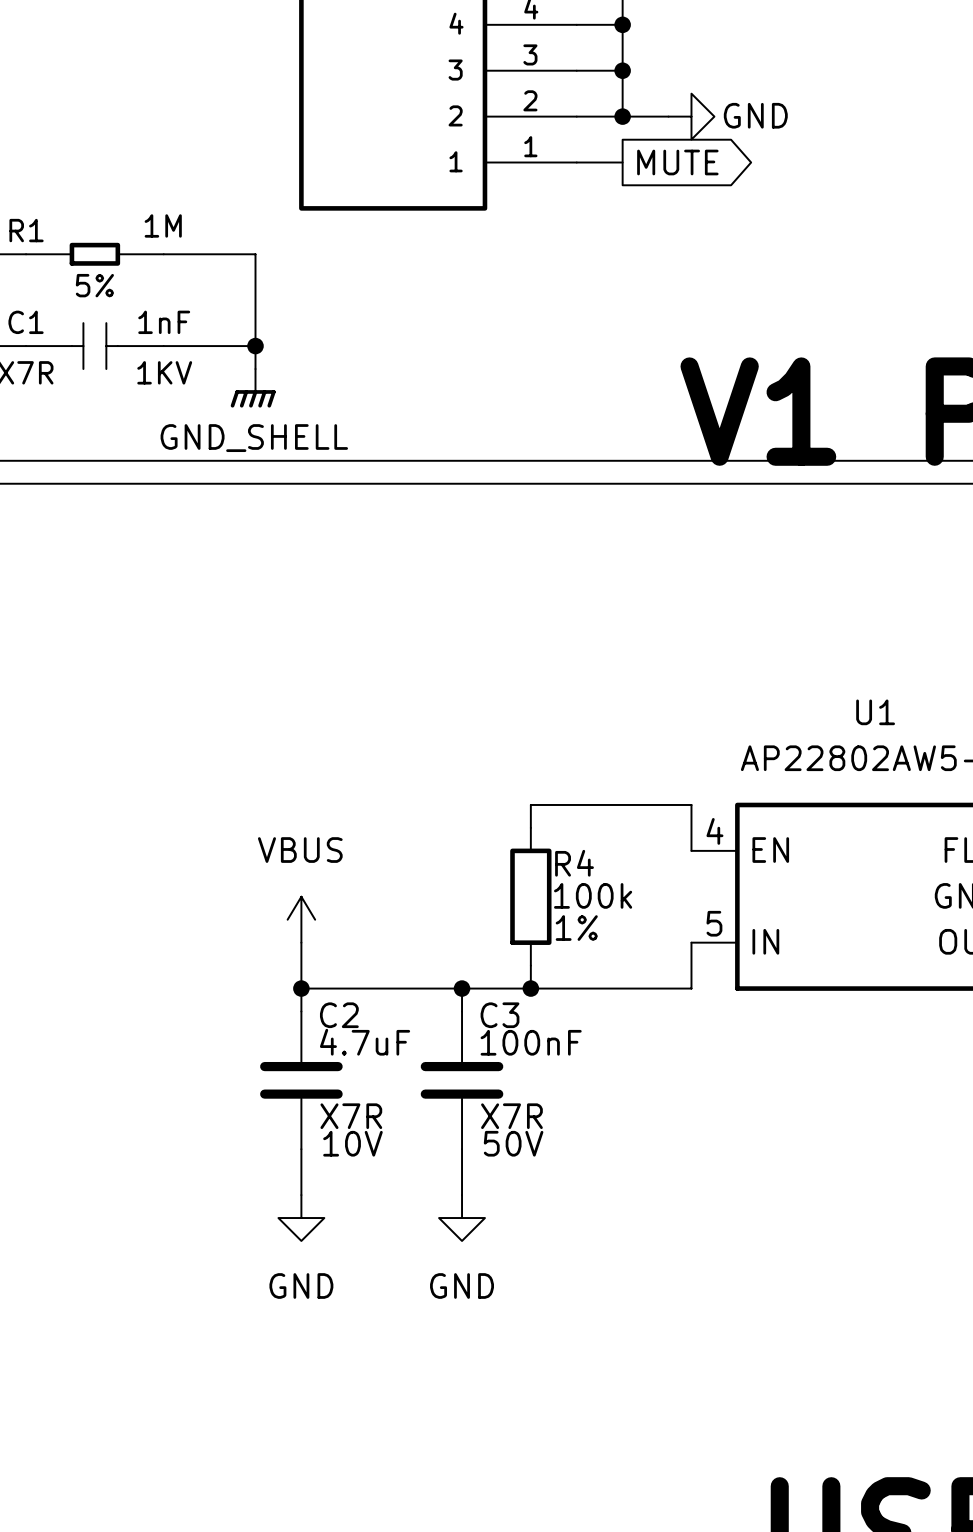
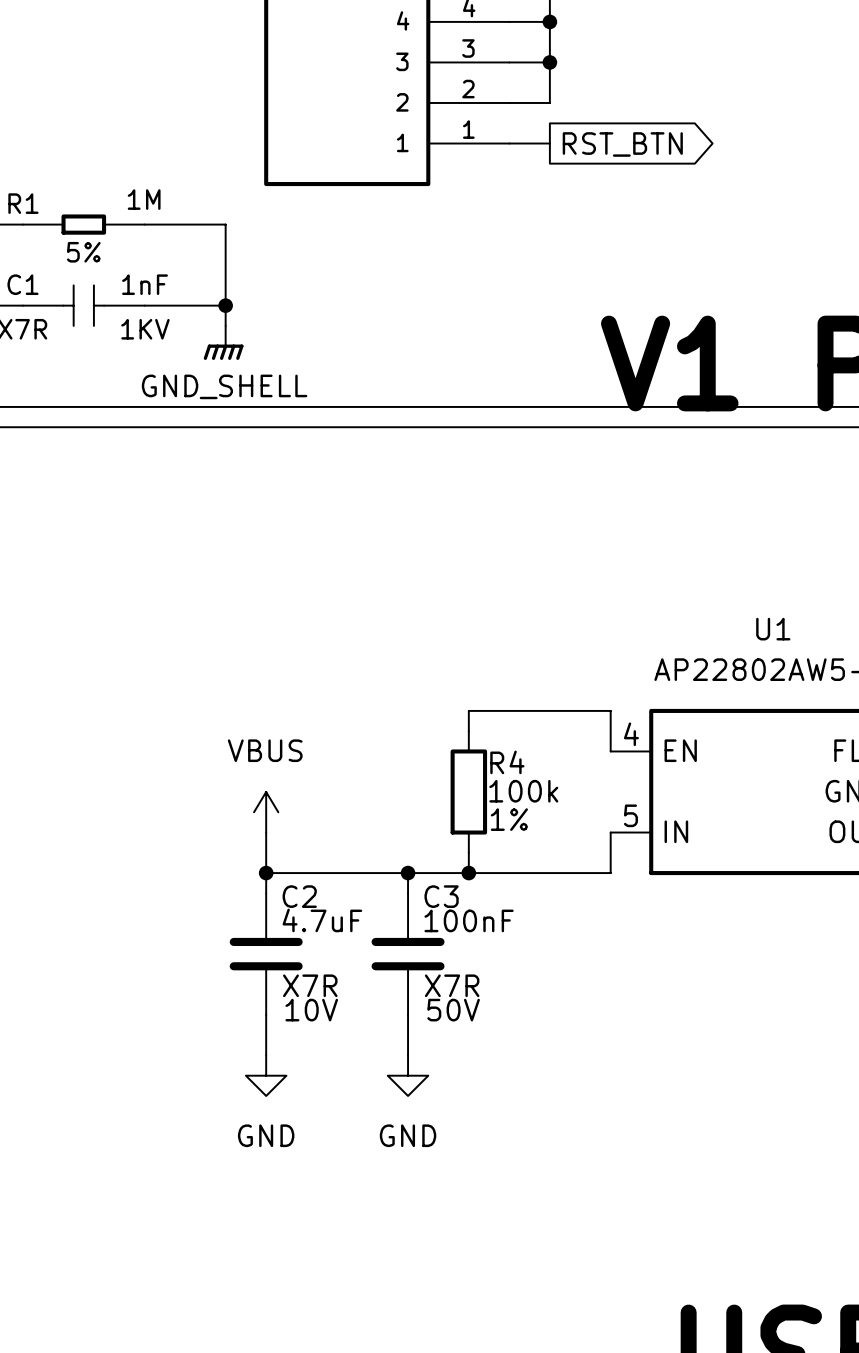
wire: (622, 116) (668, 116) -> none
junction: (622, 116) -> none
power symbol: GND (691, 116) -> none
global label: MUTE (677, 162) -> RST_BTN (622, 144)

